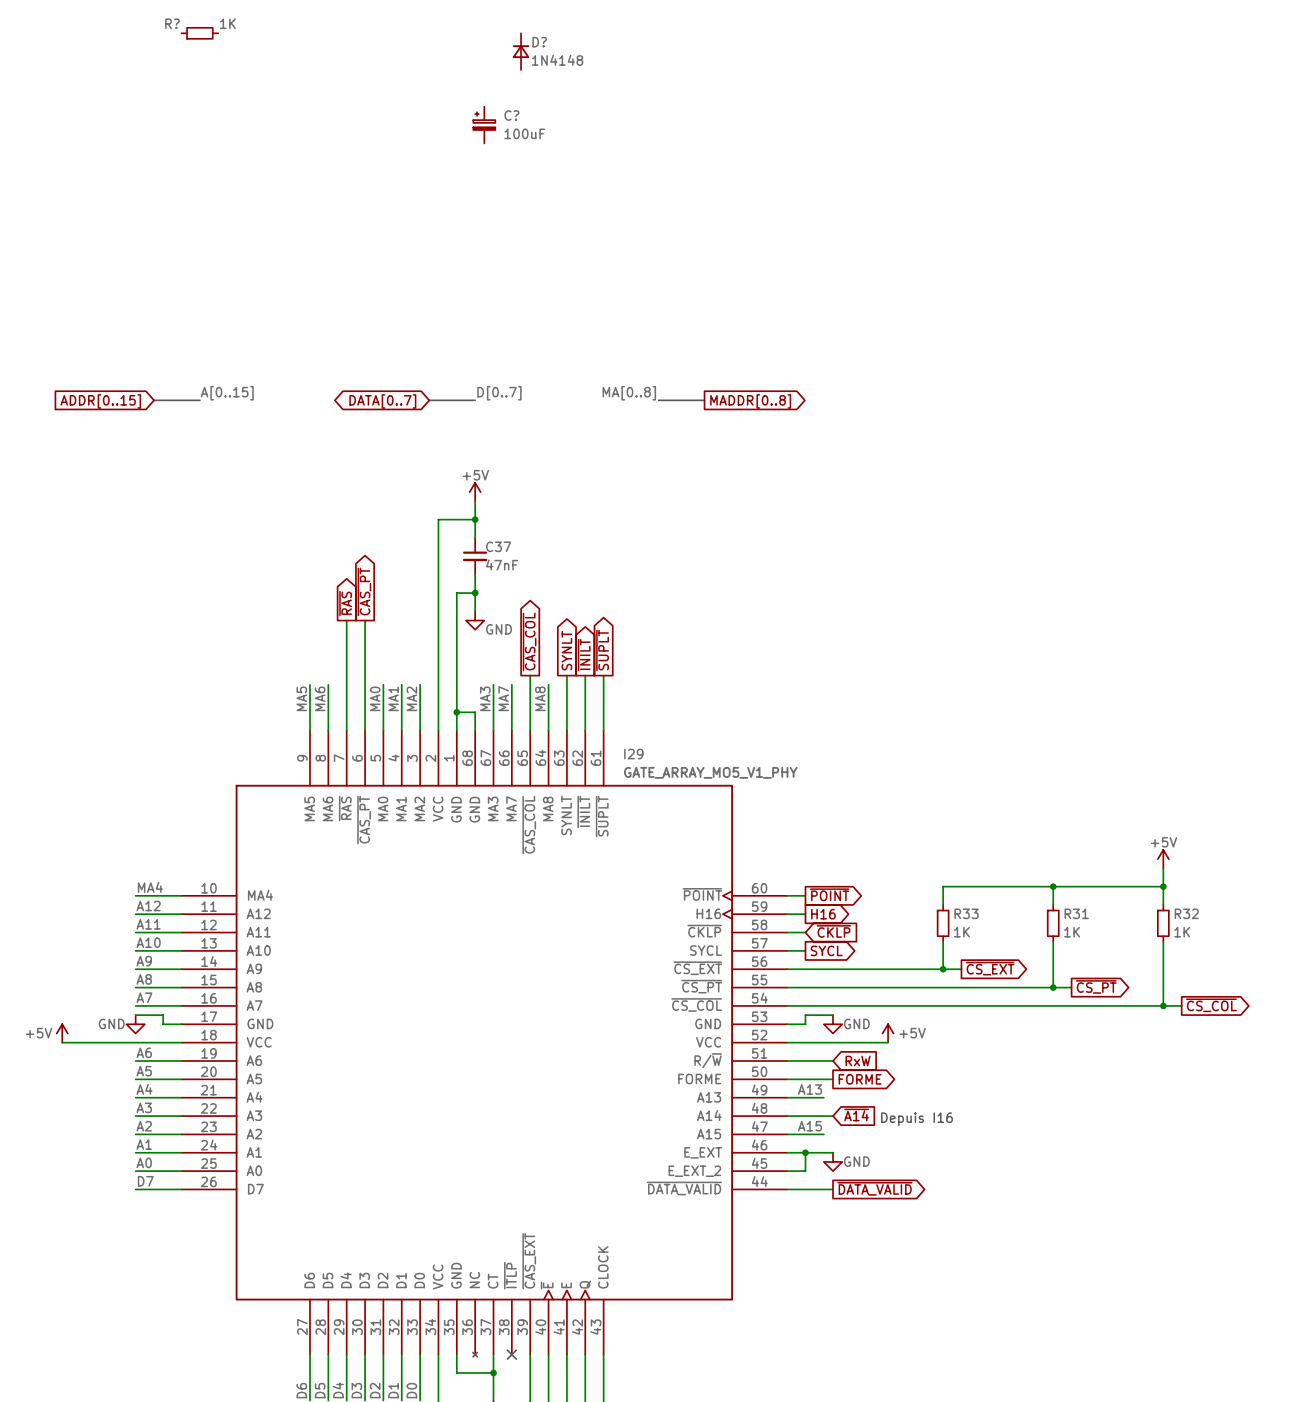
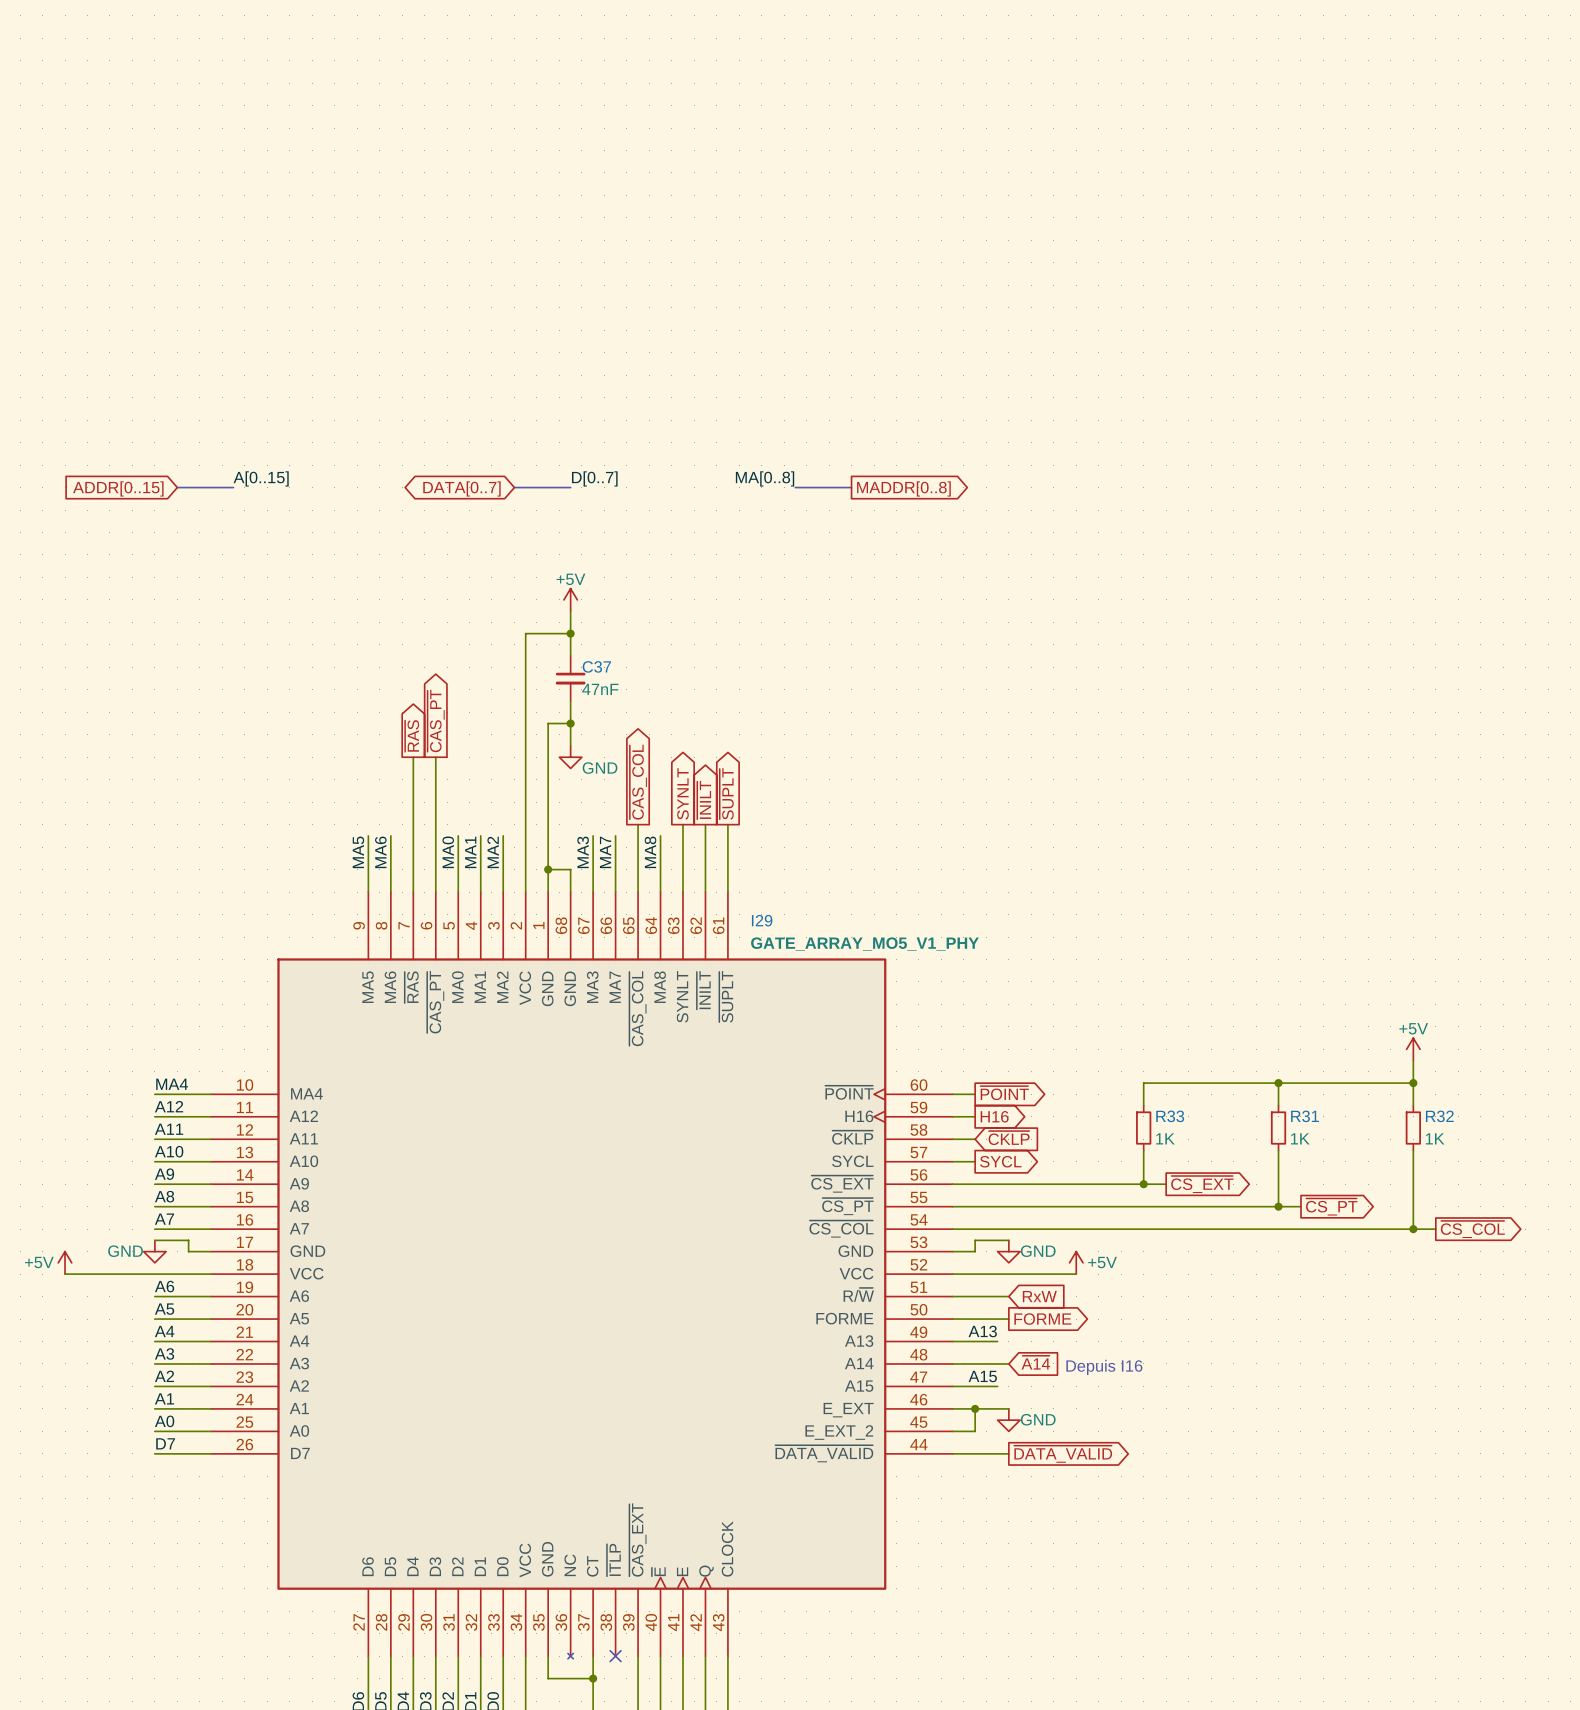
R?: 1K (199, 33) -> none
D?: 1N4148 (521, 51) -> none
C?: 100uF (484, 125) -> none

